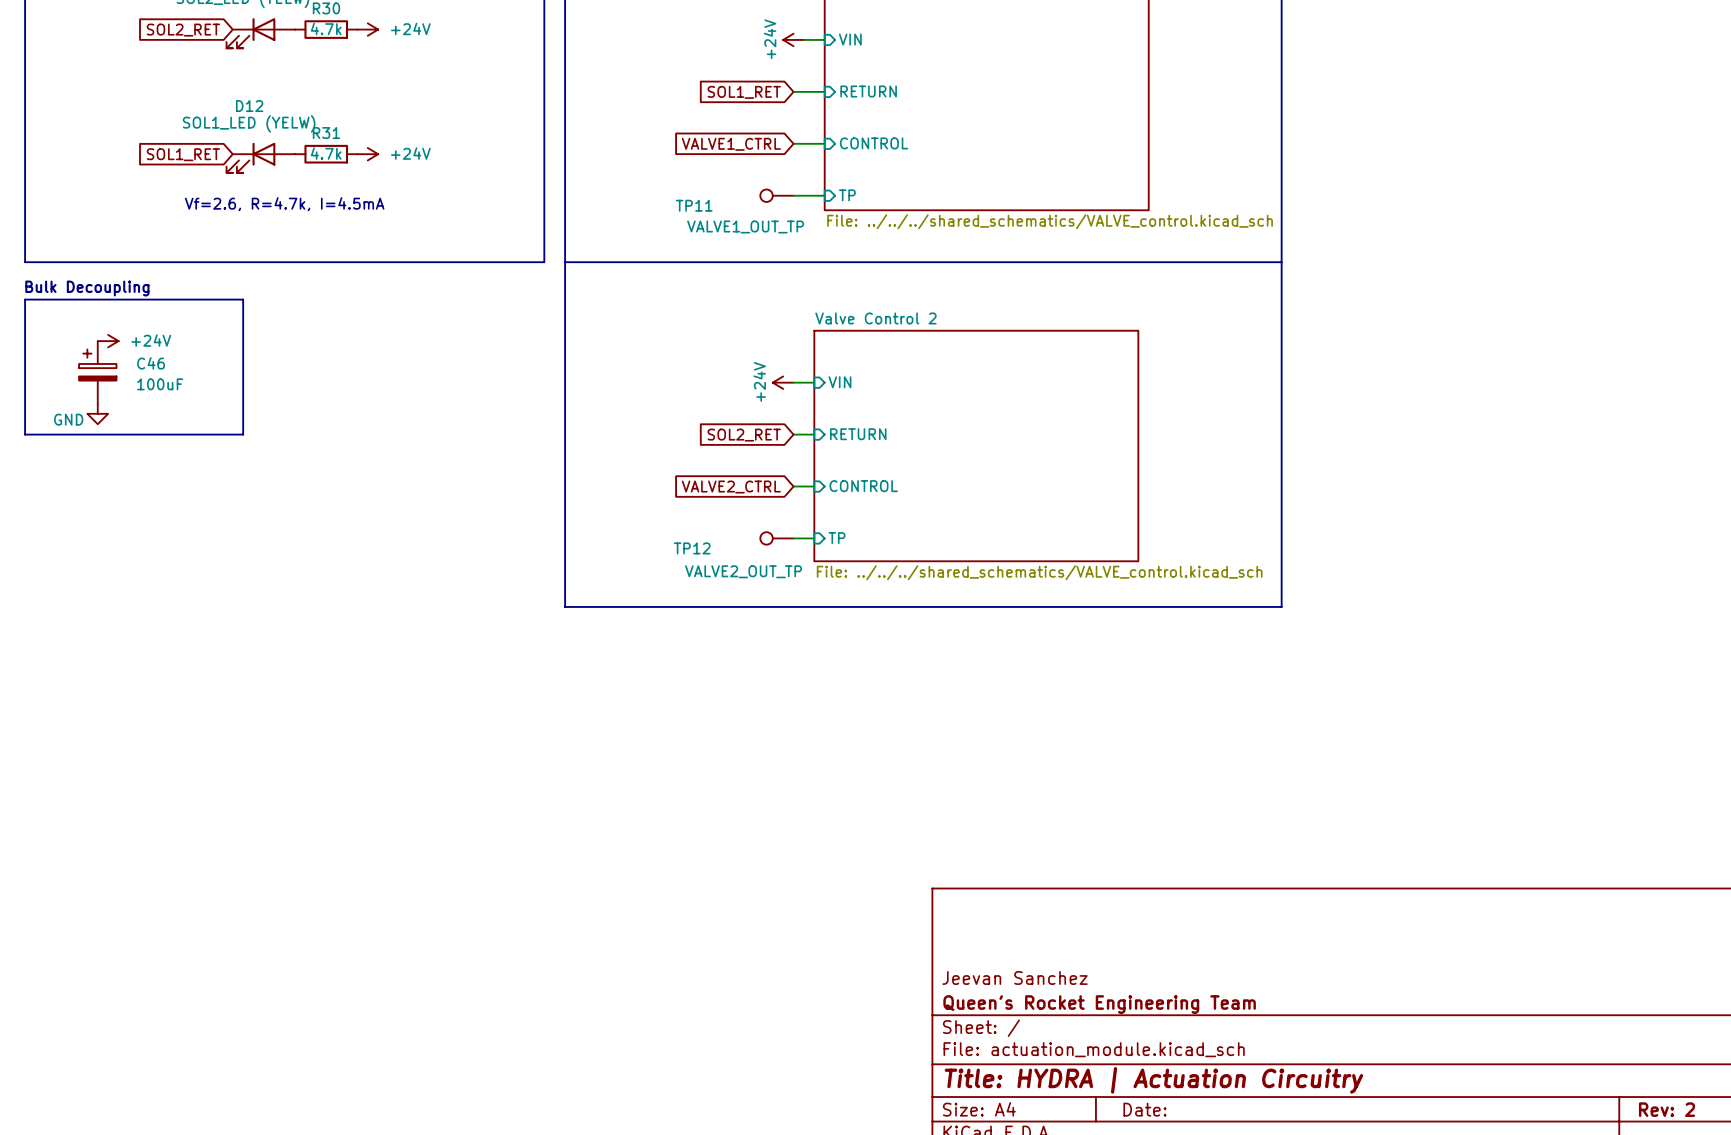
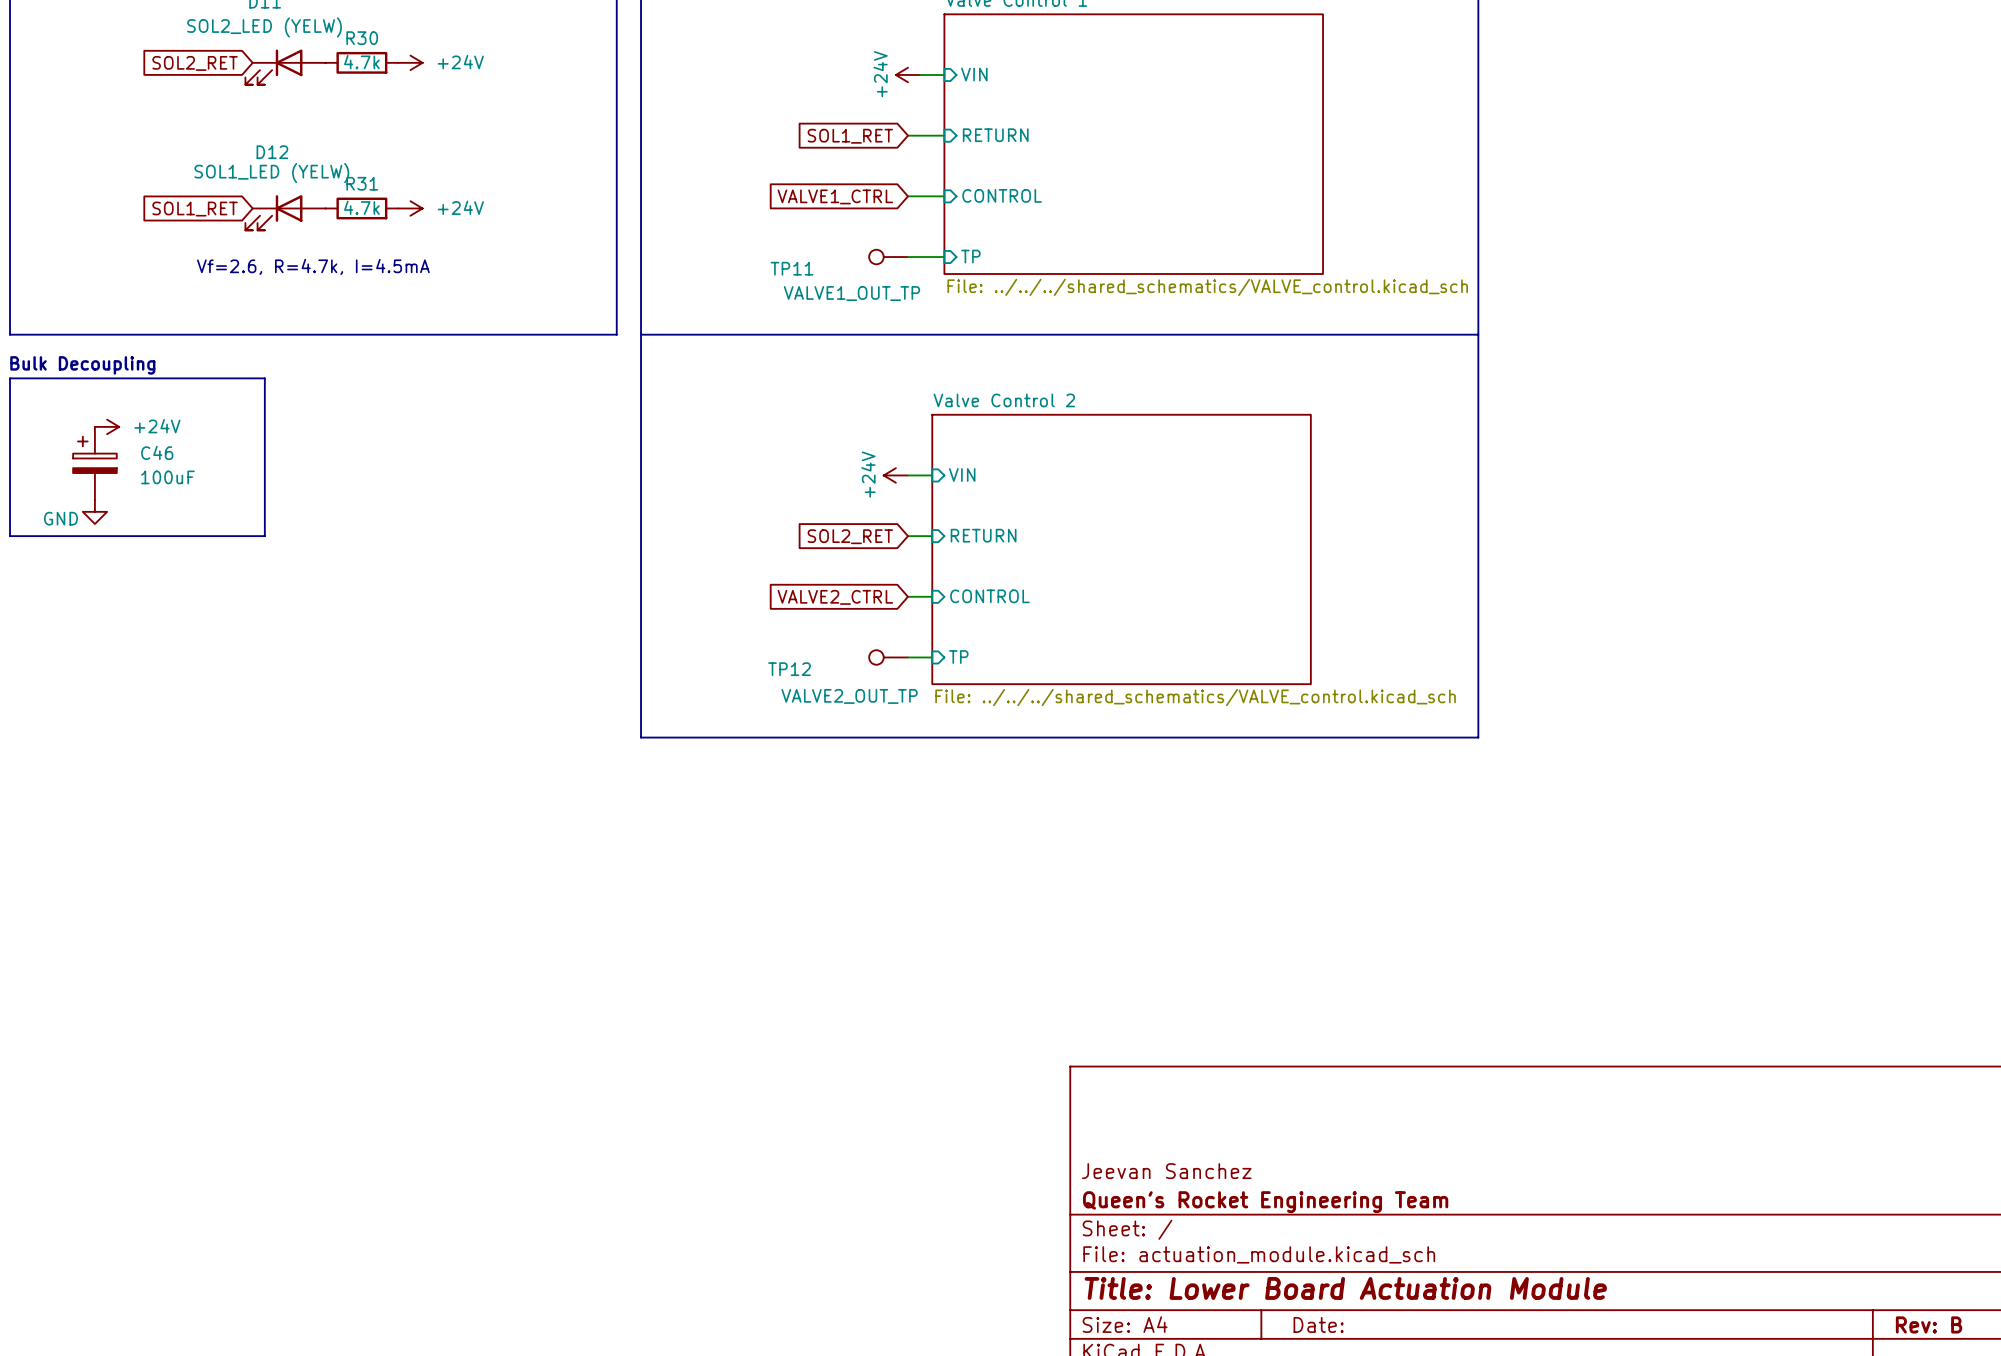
title block: Title: HYDRA | Actuation Circuitry (1153, 1080) -> Title: Lower Board Actuation Module (1345, 1288)
title block: Rev: 2 (1667, 1109) -> Rev: B (1929, 1324)

